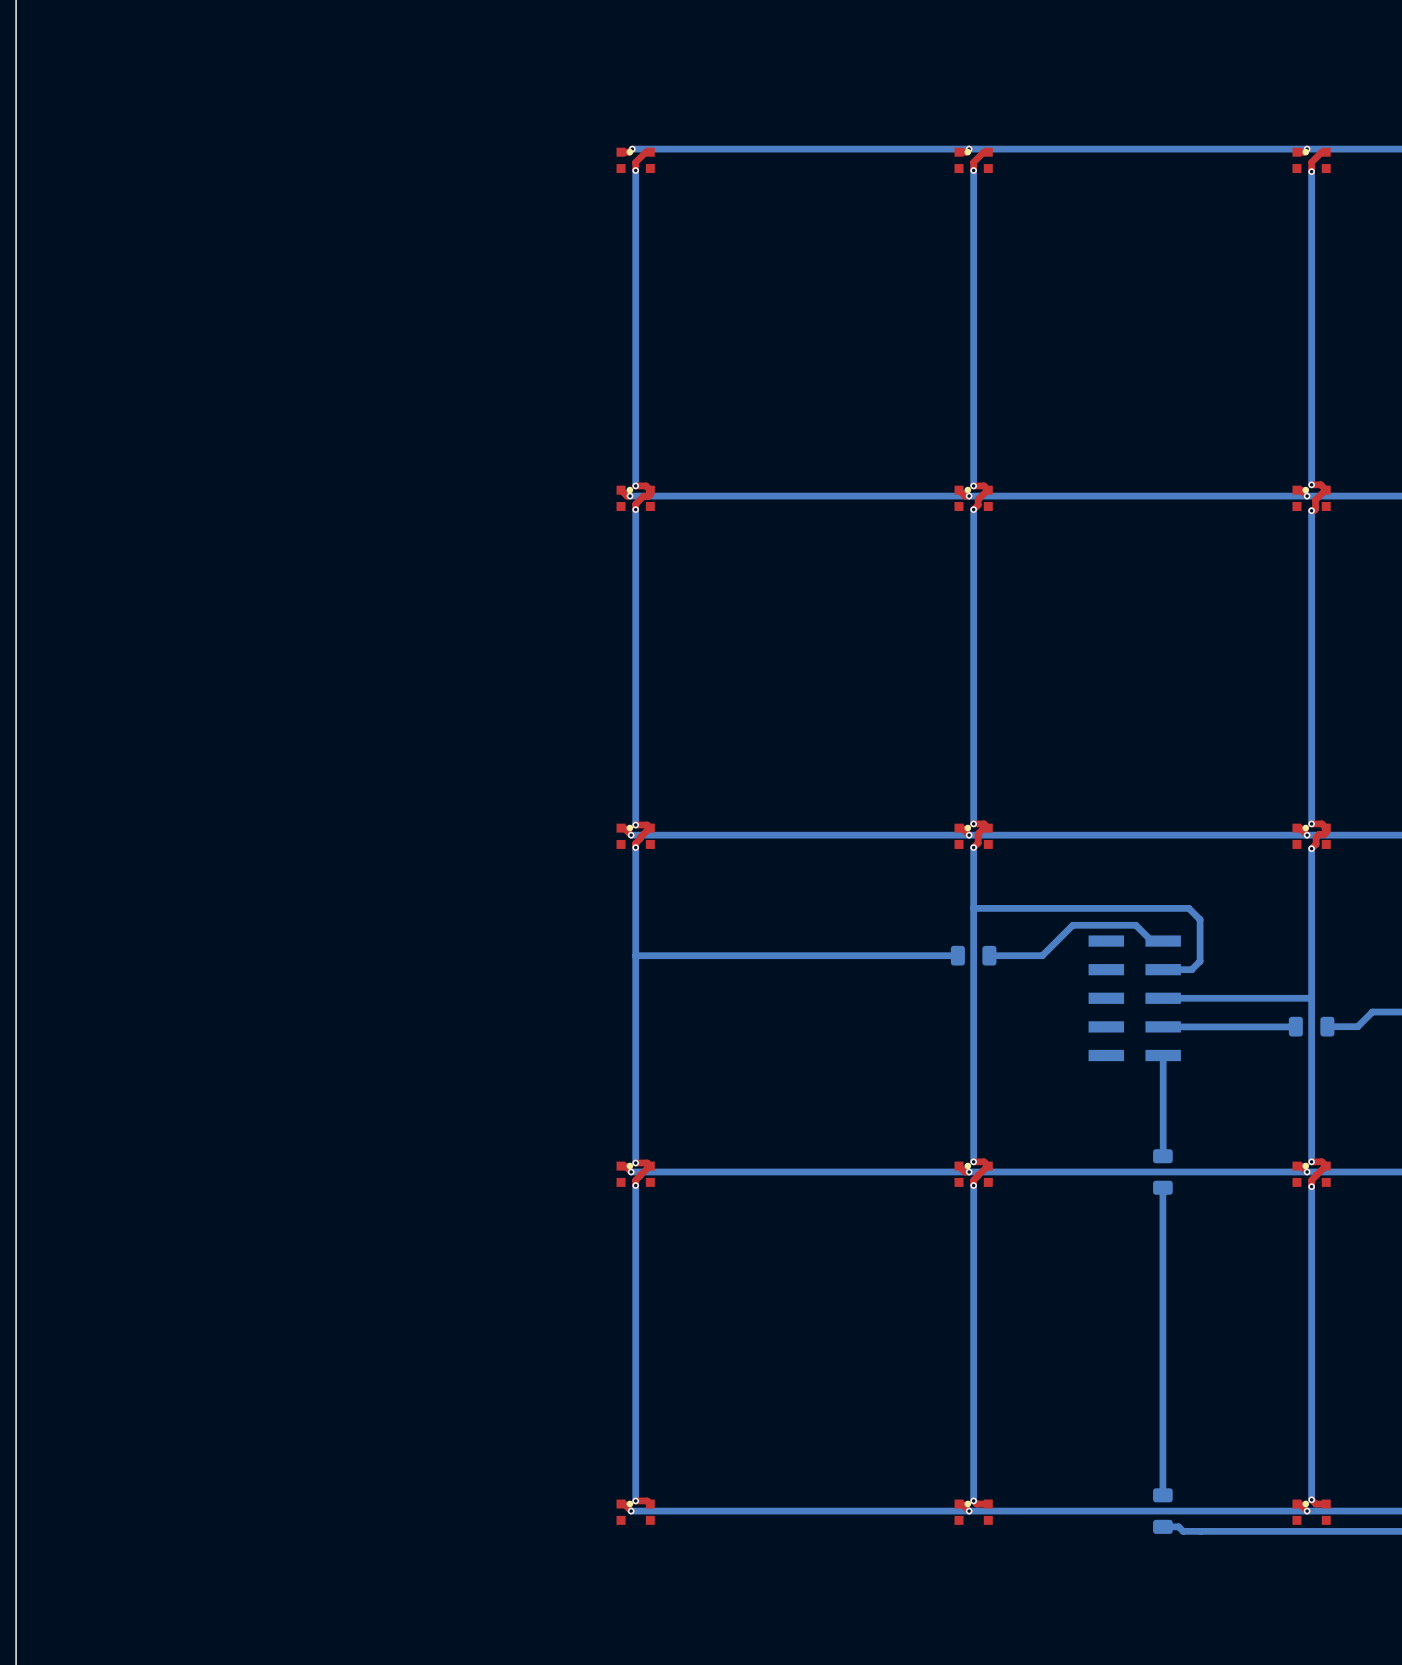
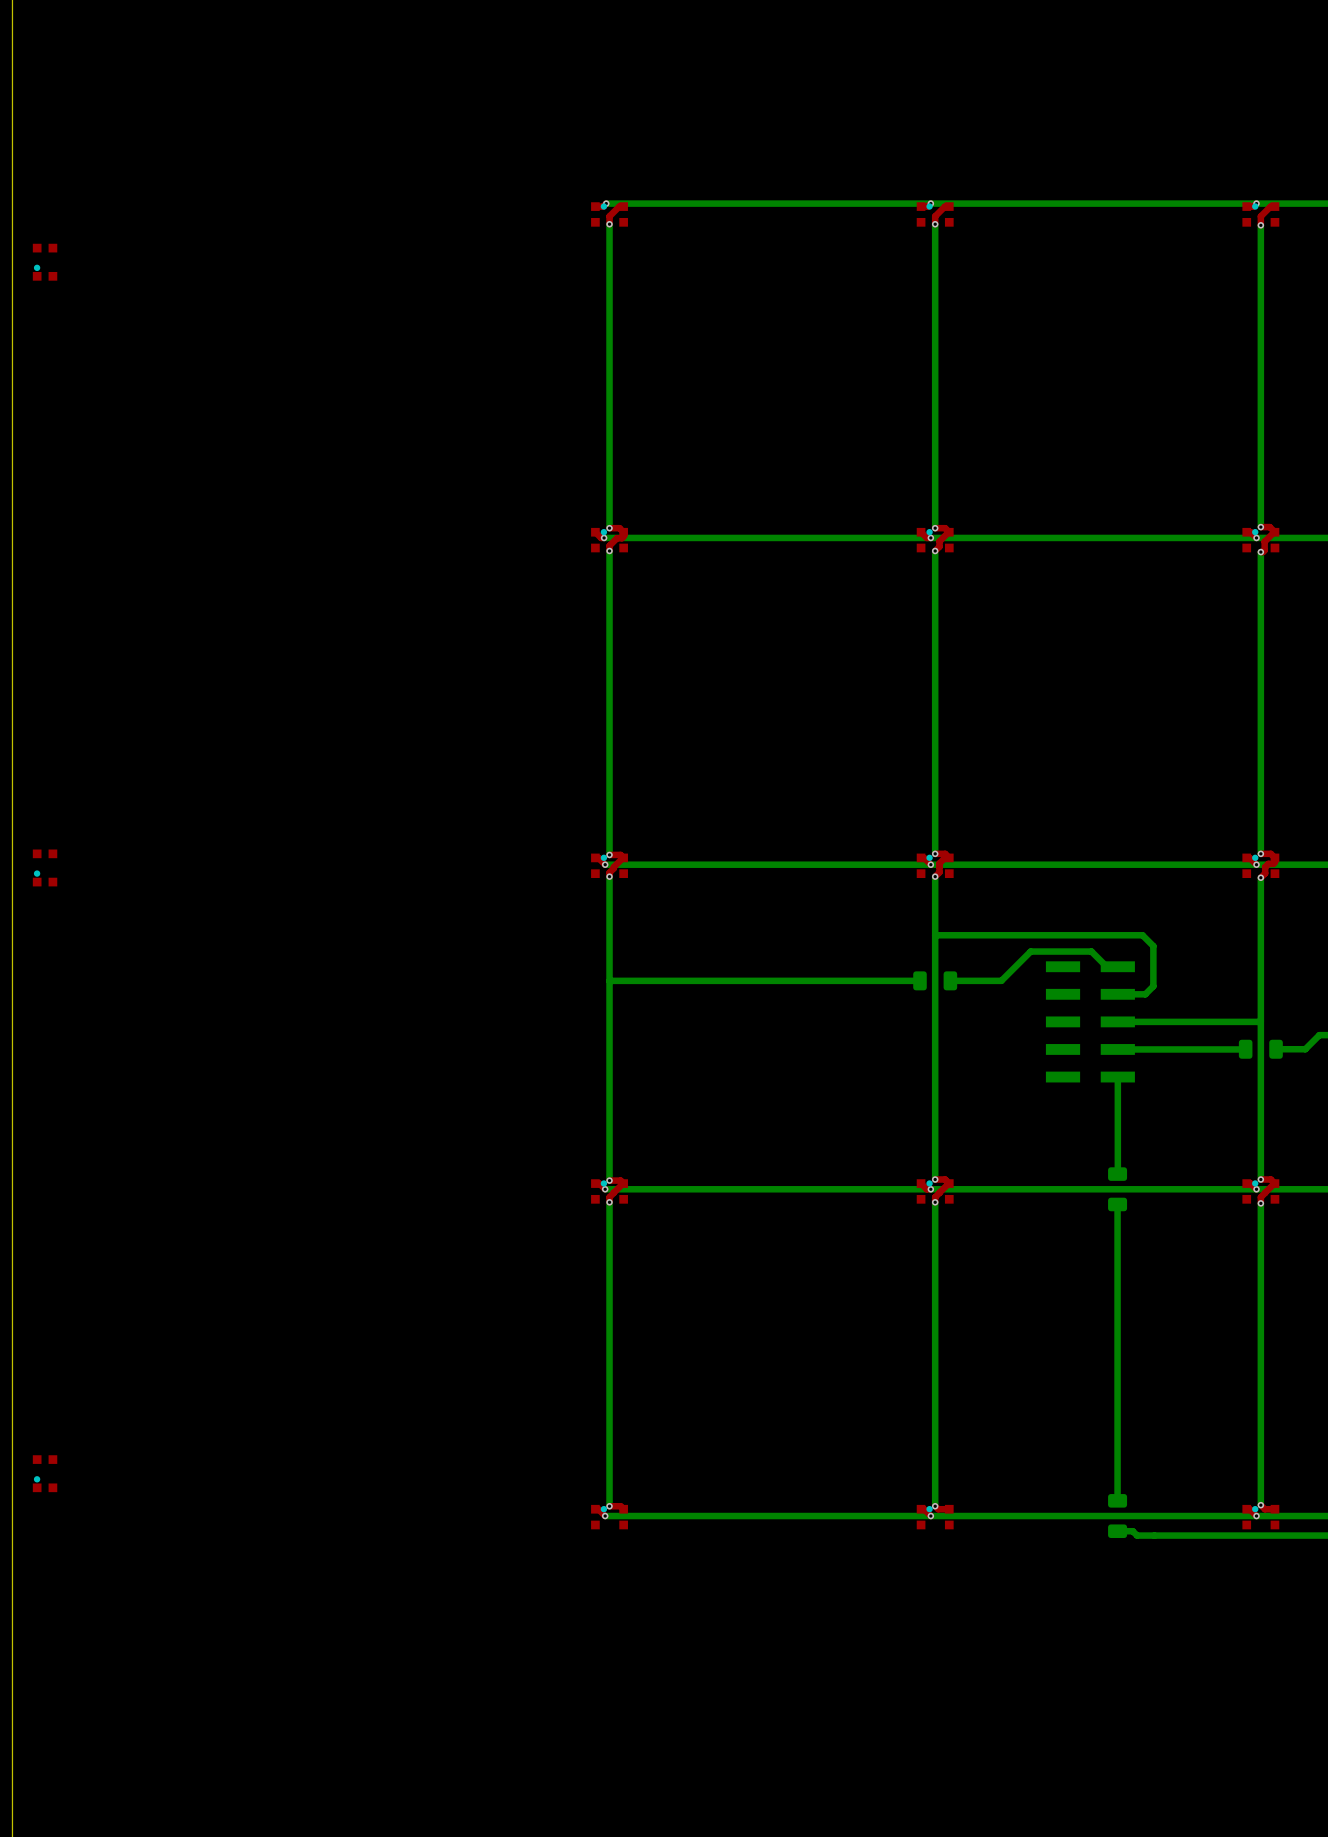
part: none -> (45, 262)
part: none -> (45, 867)
part: none -> (45, 1473)

